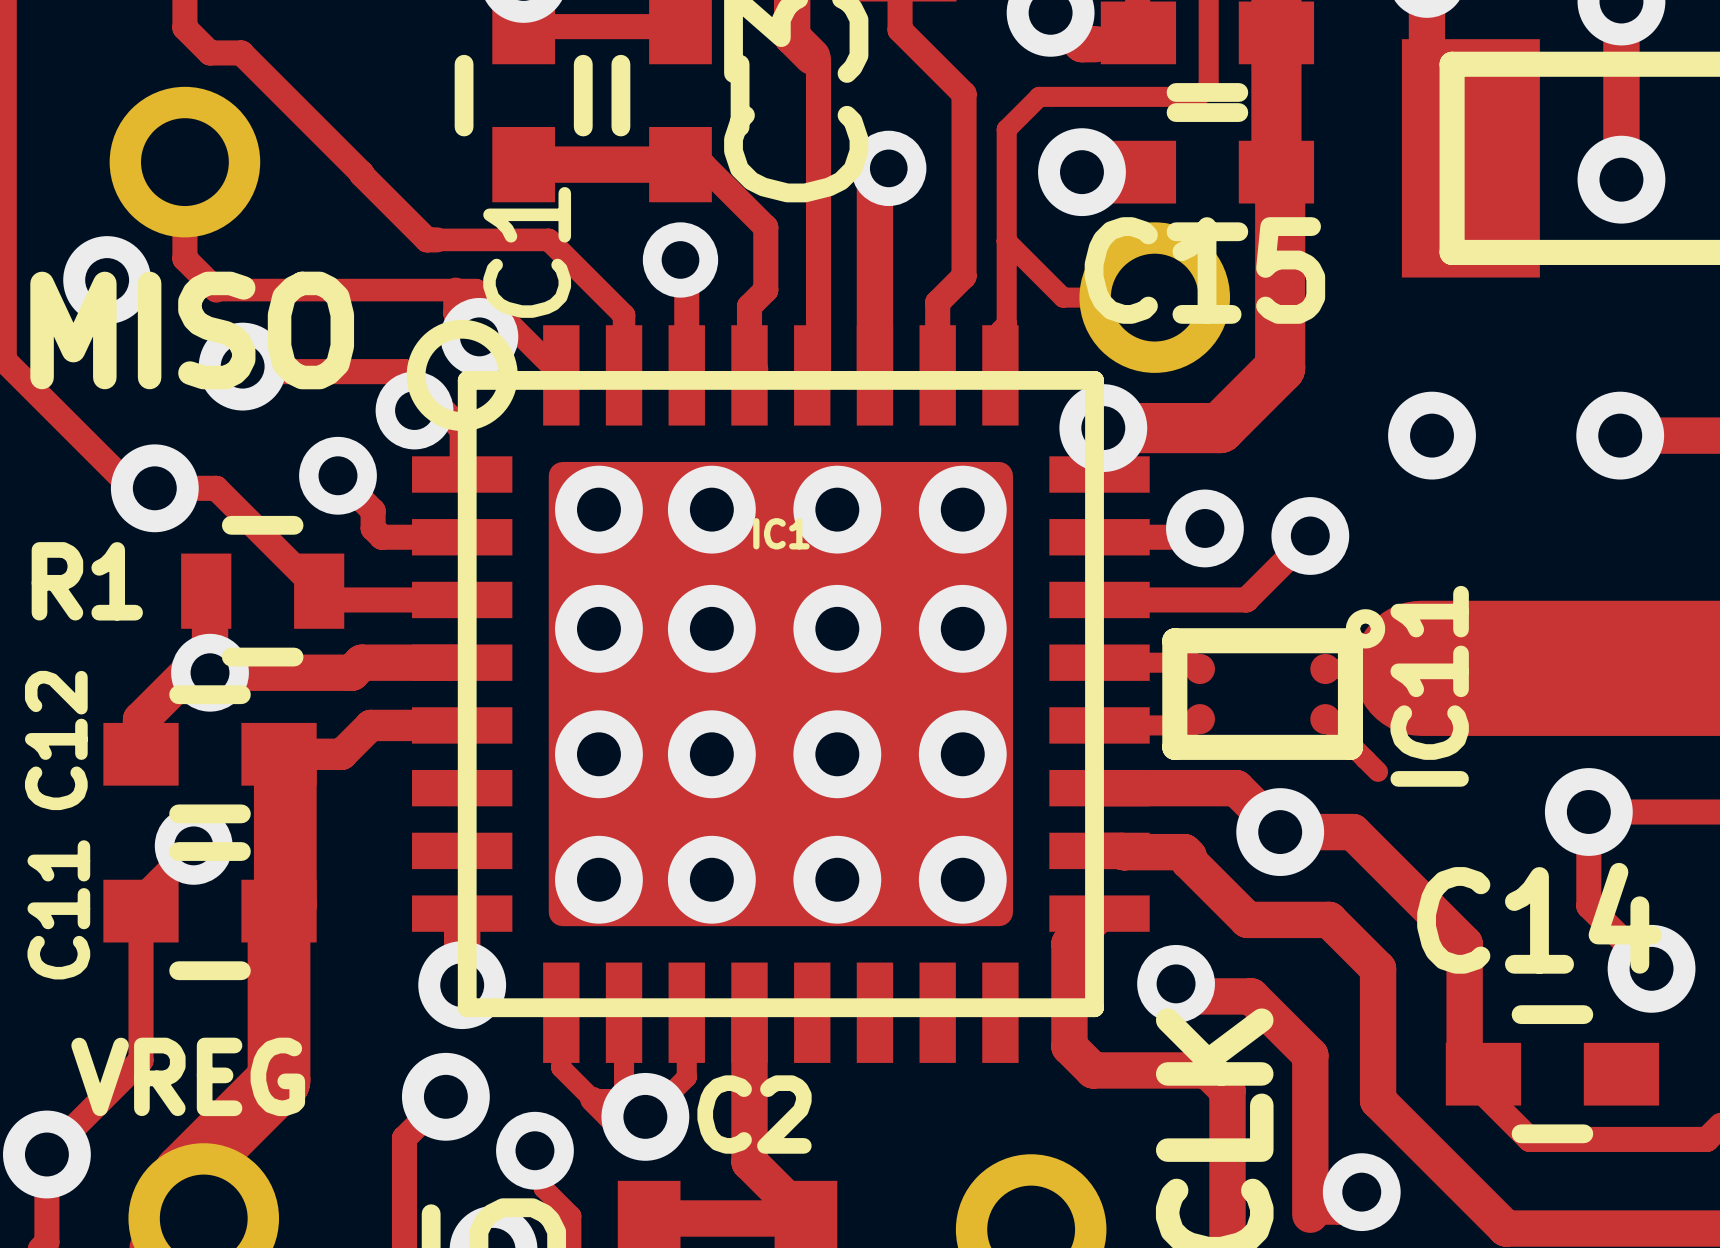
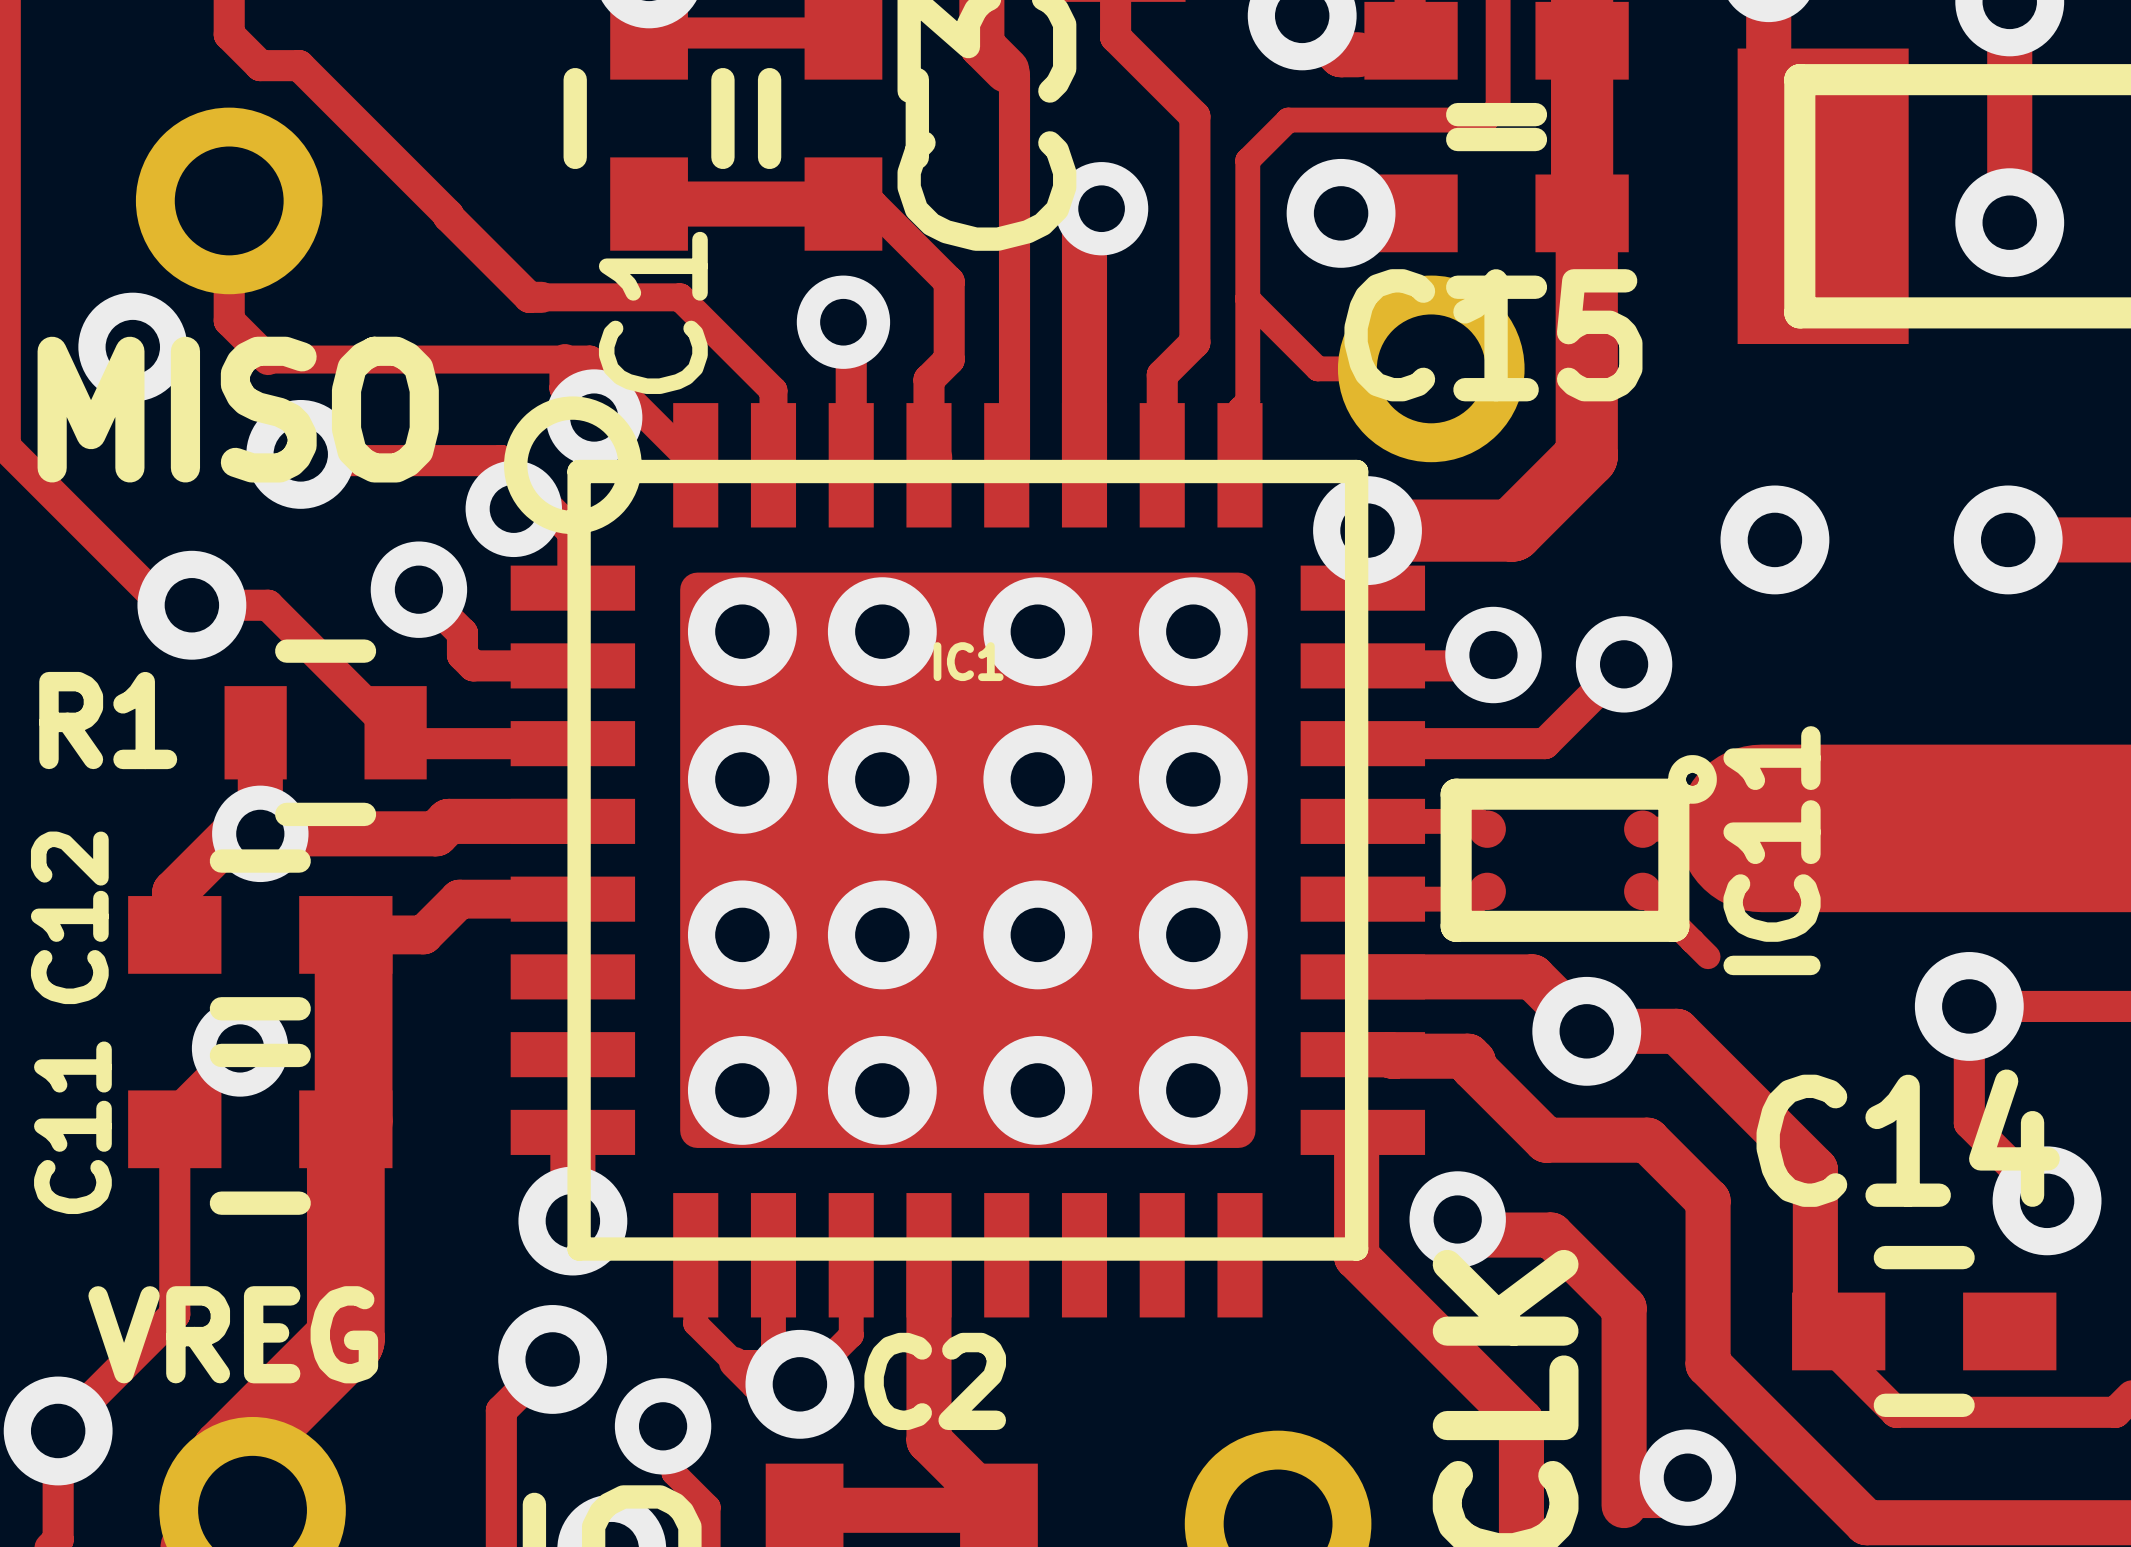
track: (1094, 918) (1069, 943) (1069, 1046) (1093, 1070) (1207, 1070) (1227, 1090) (1227, 1146) -> (1356, 1138) (1356, 1256) (1521, 1421)

